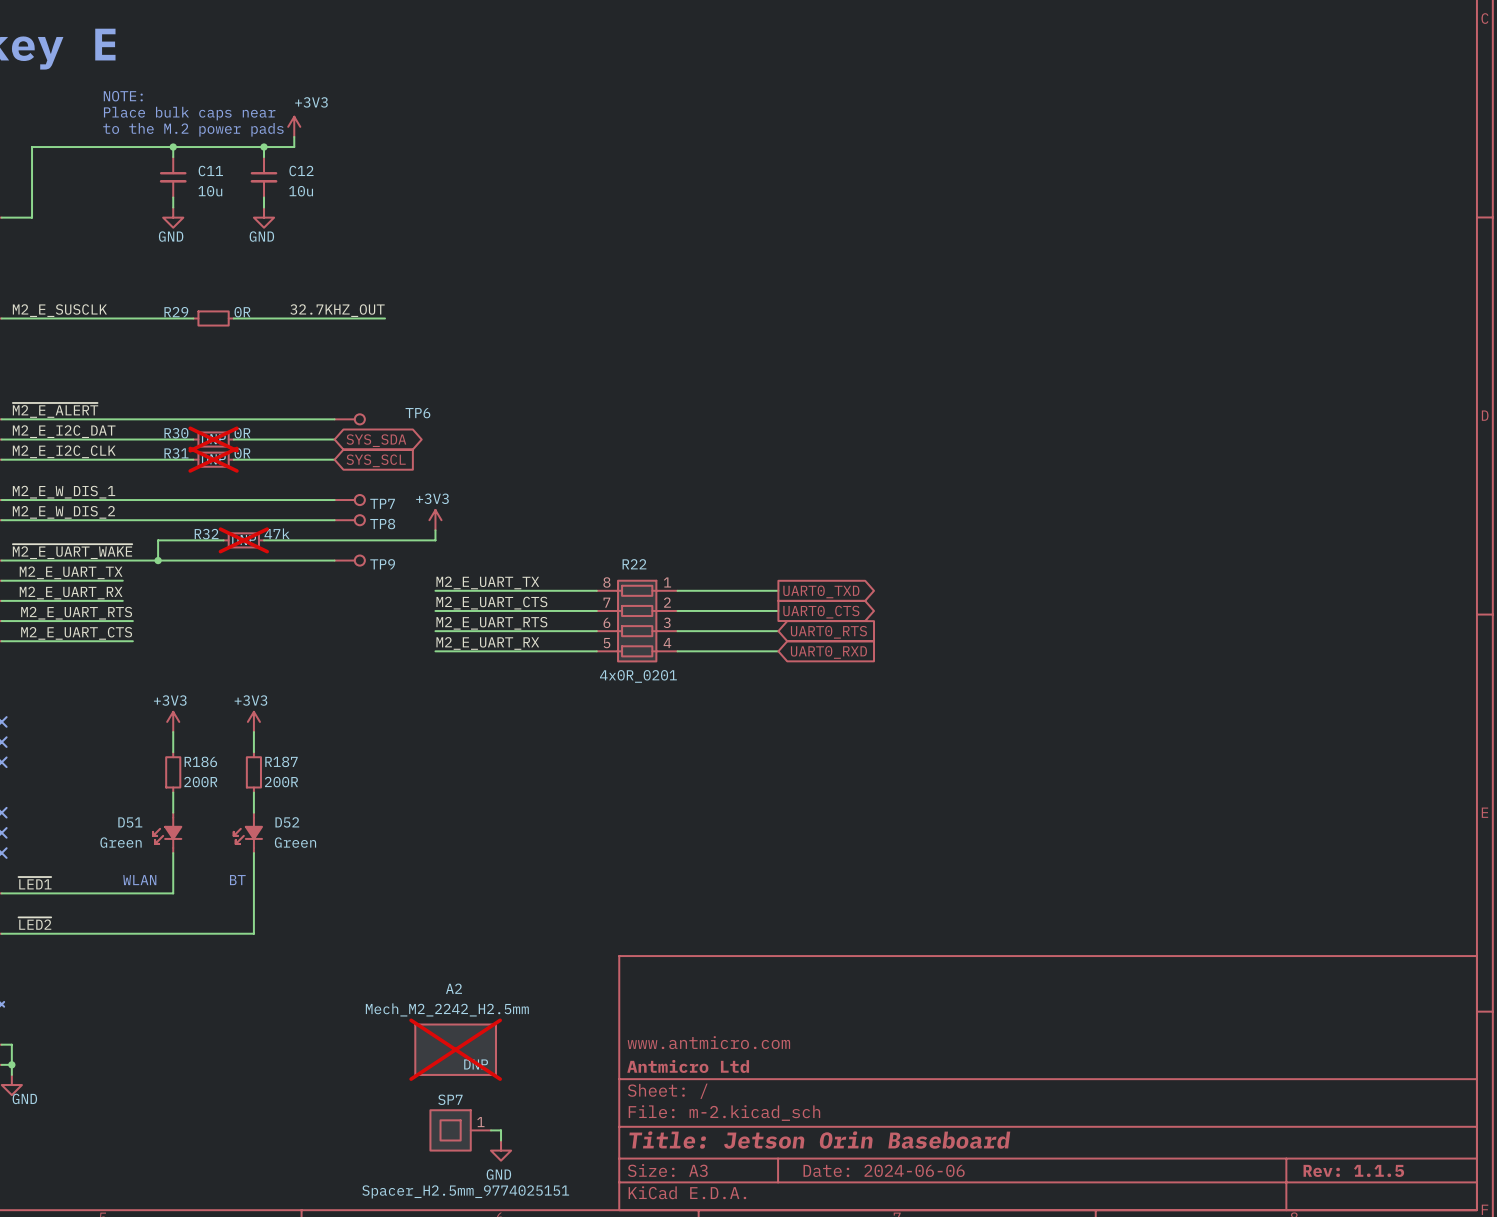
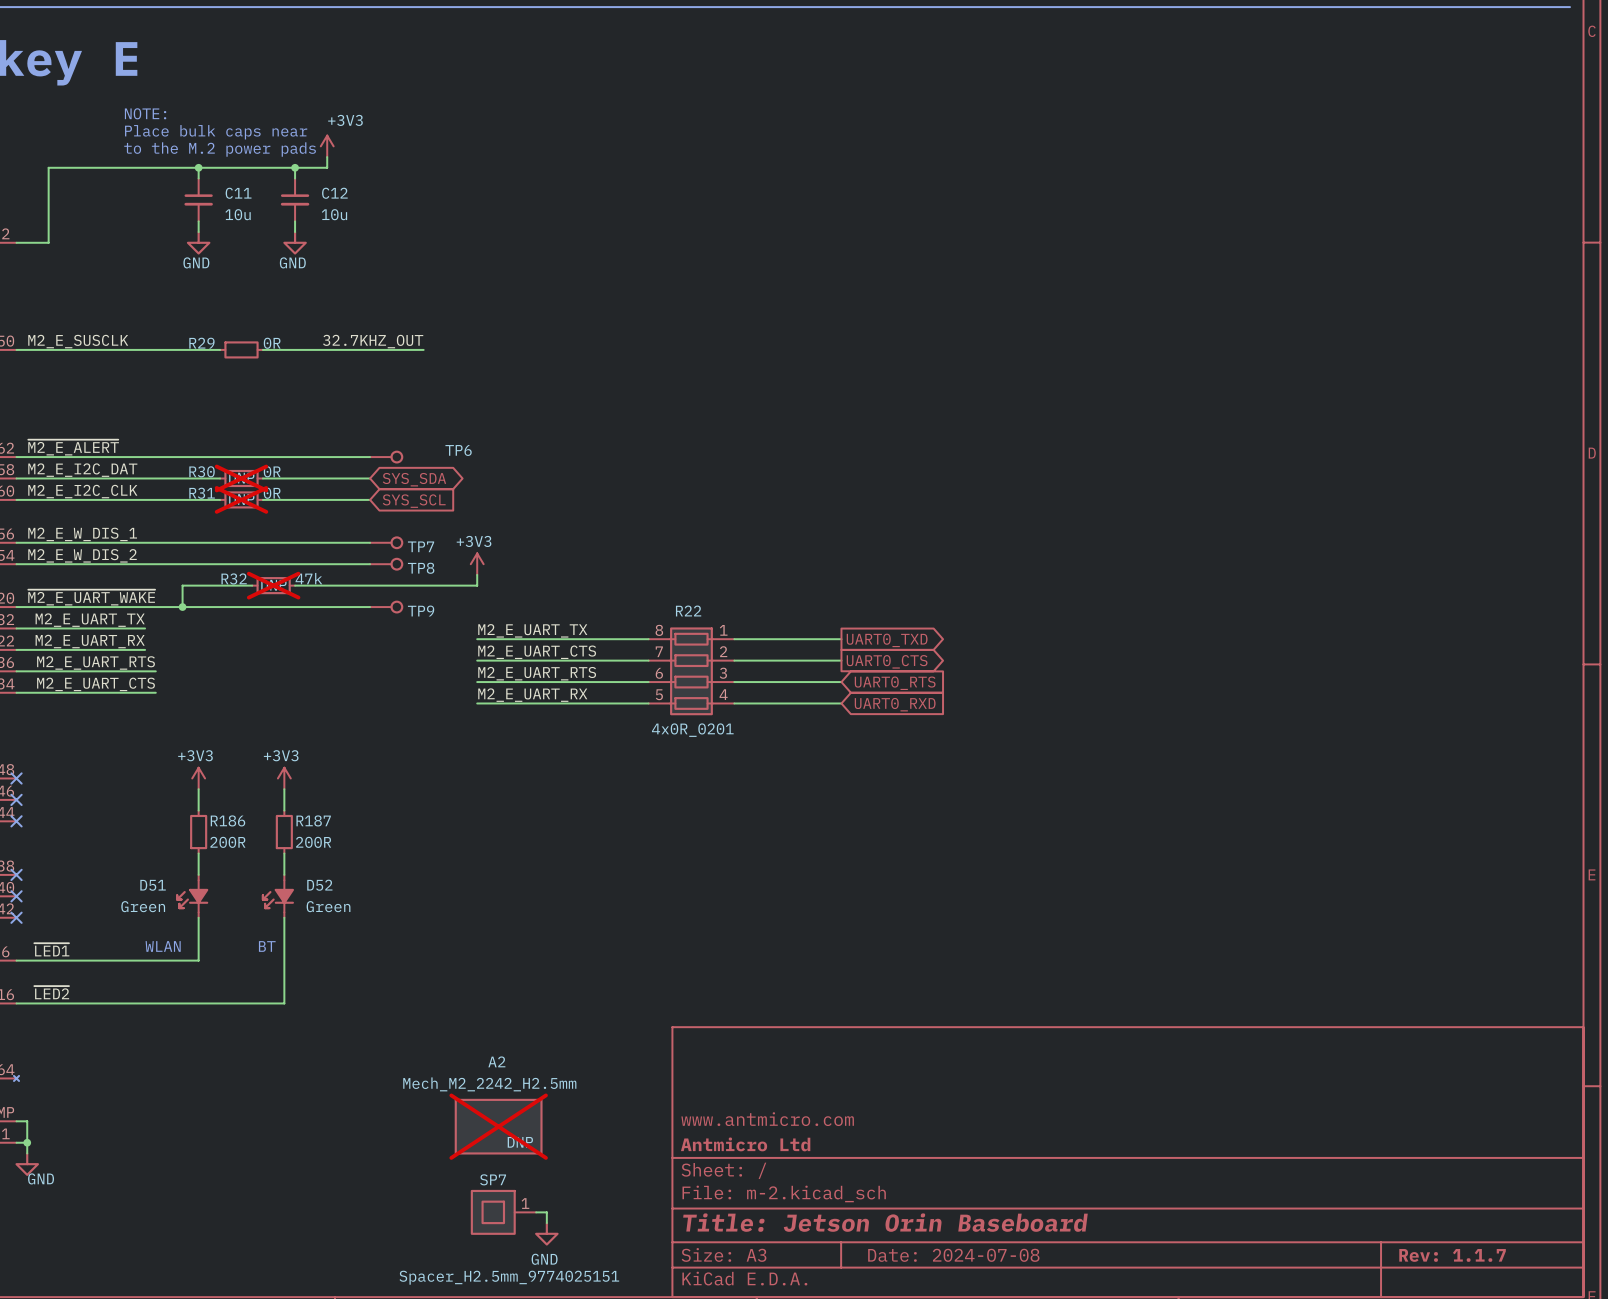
title block: Date: 2024-06-06 (884, 1170) -> Date: 2024-07-08 (953, 1255)
title block: Rev: 1.1.5 (1353, 1170) -> Rev: 1.1.7 (1452, 1255)

